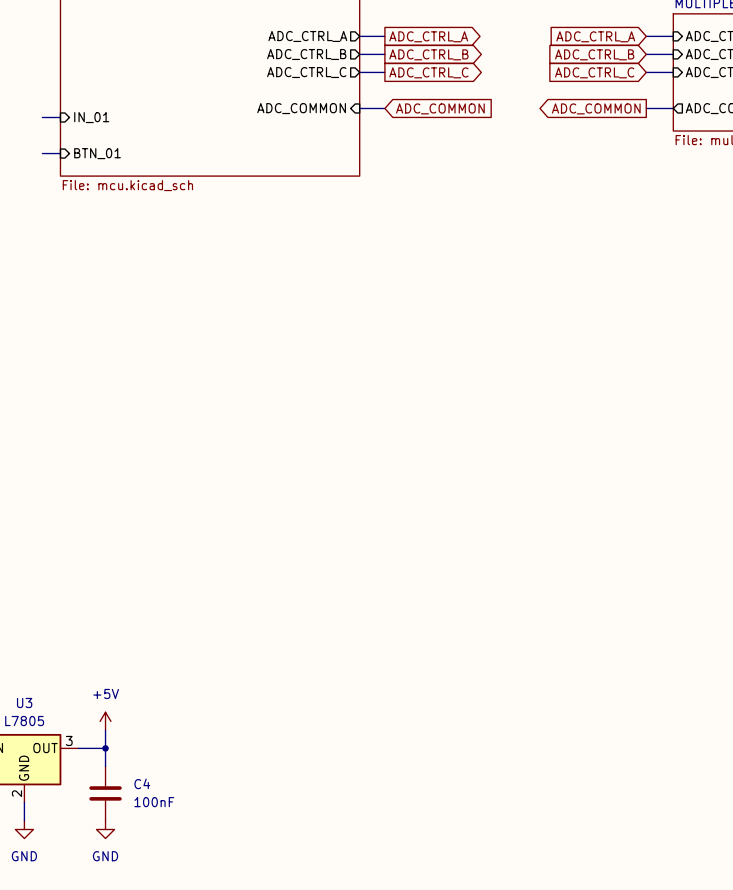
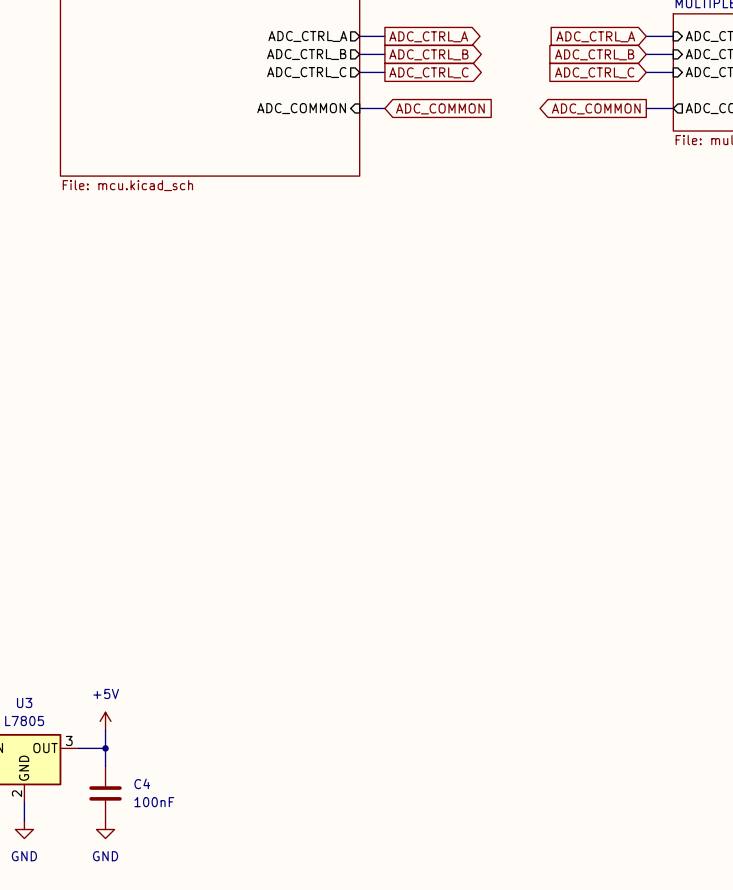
wire: (42, 117) (60, 117) -> none
sheet pin: IN_01 (91, 117) -> none
wire: (42, 153) (60, 153) -> none
sheet pin: BTN_01 (97, 153) -> none

